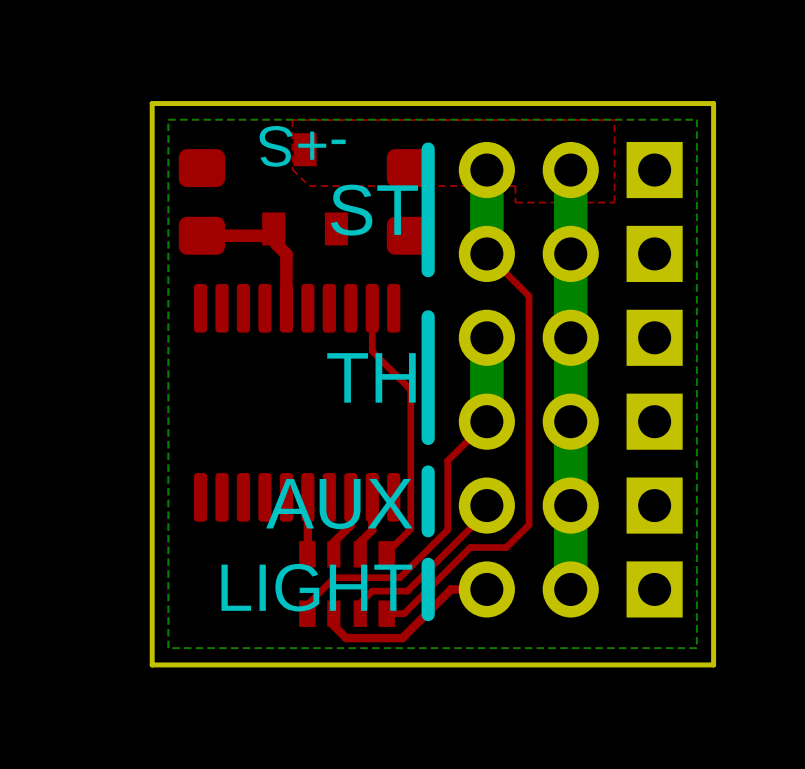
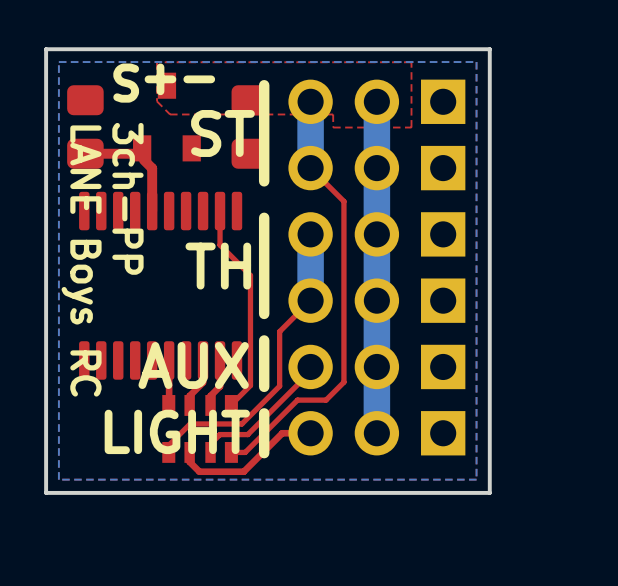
text: none -> 3ch-PP (127, 198)
text: none -> LANE Boys RC (81, 261)

